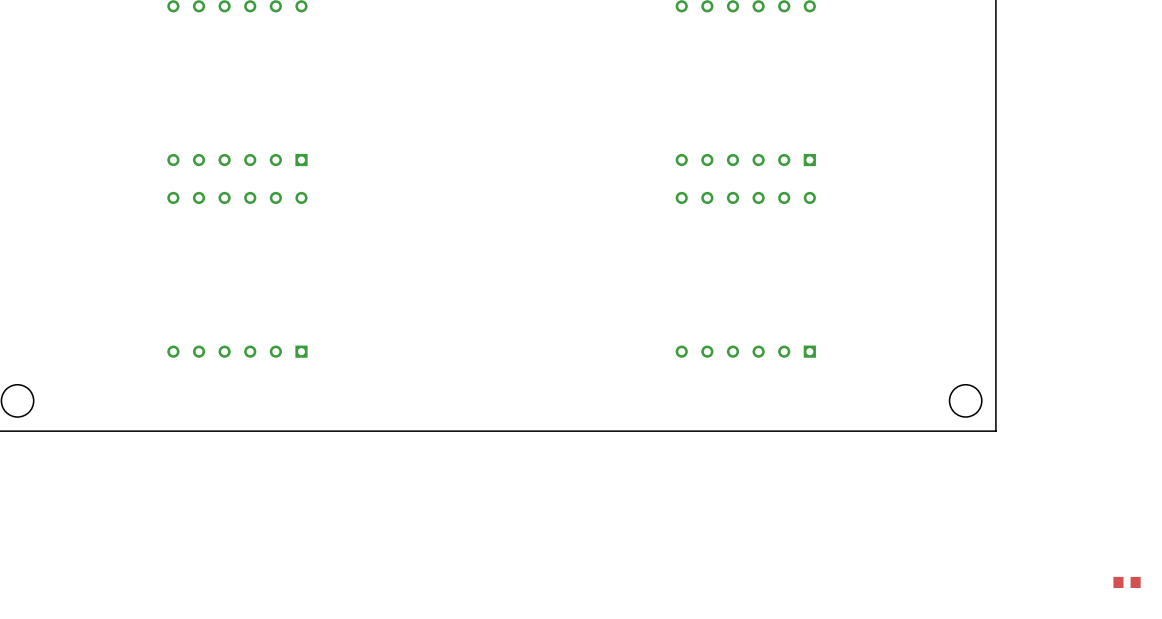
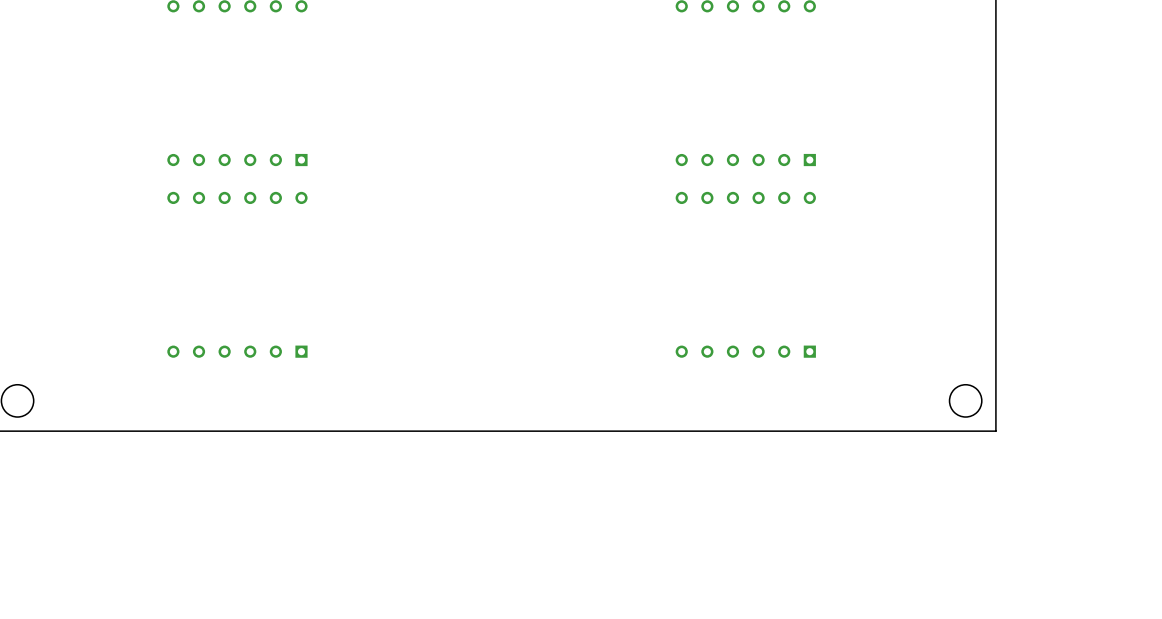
part: (1127, 582) -> none

